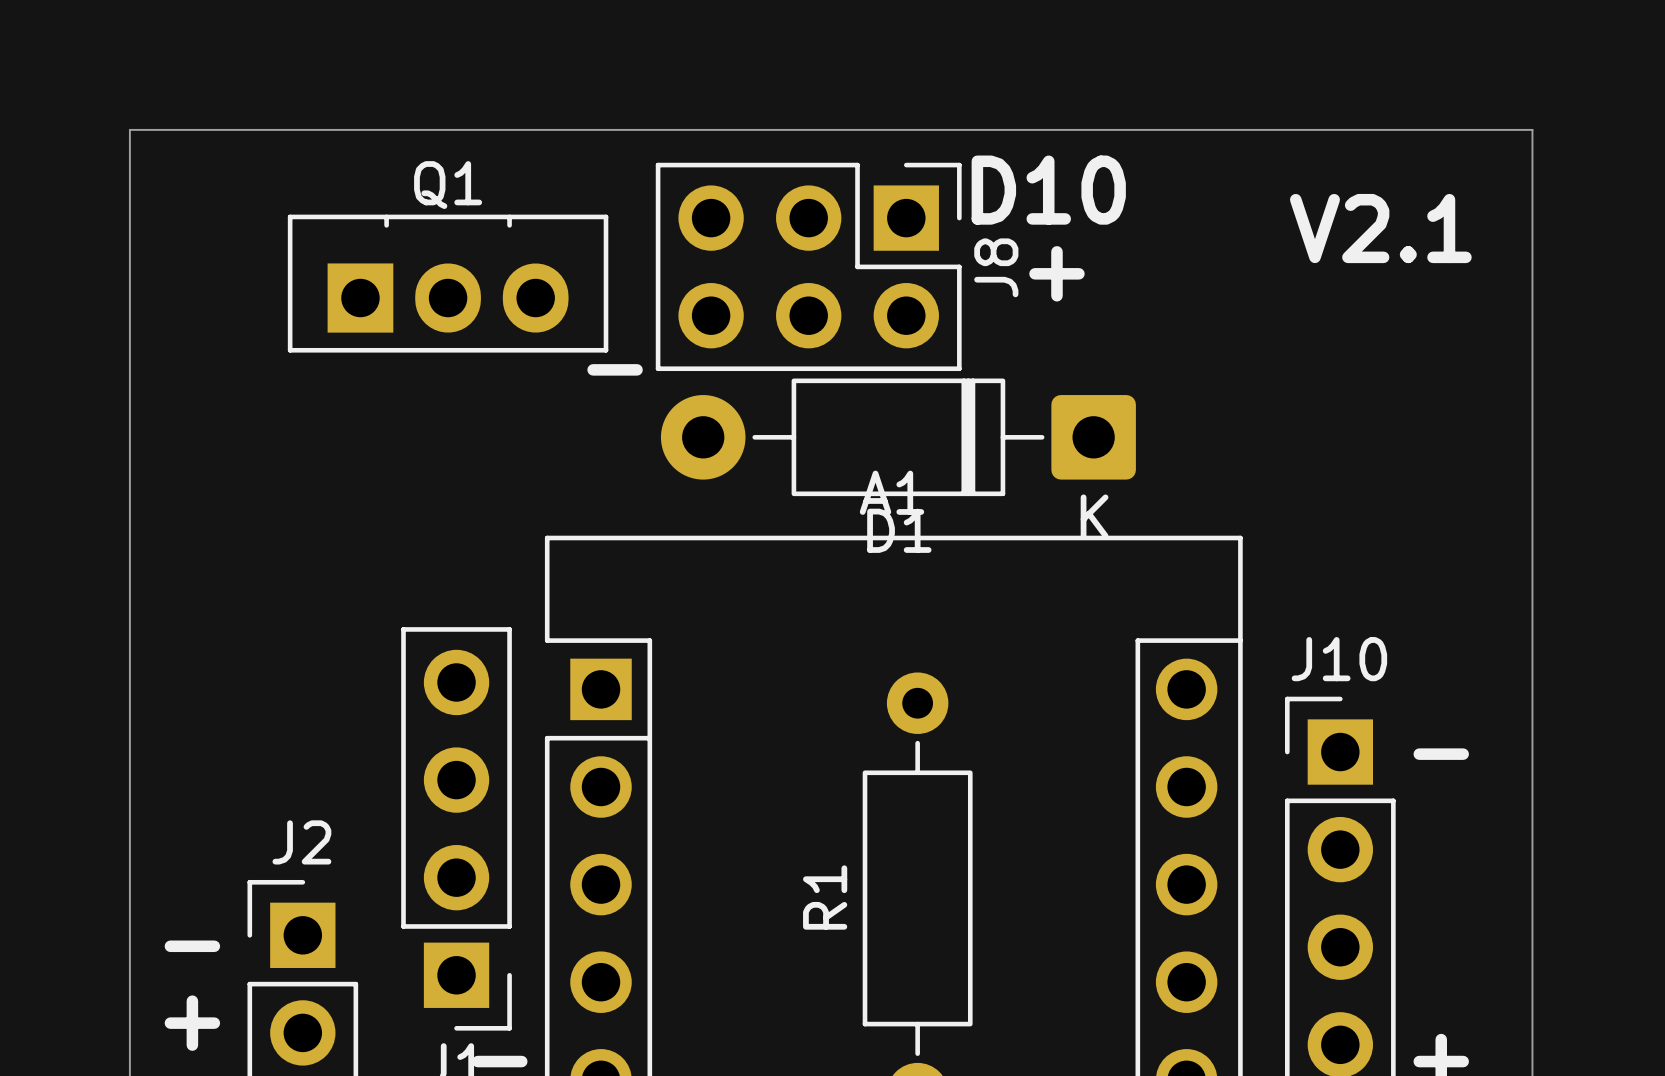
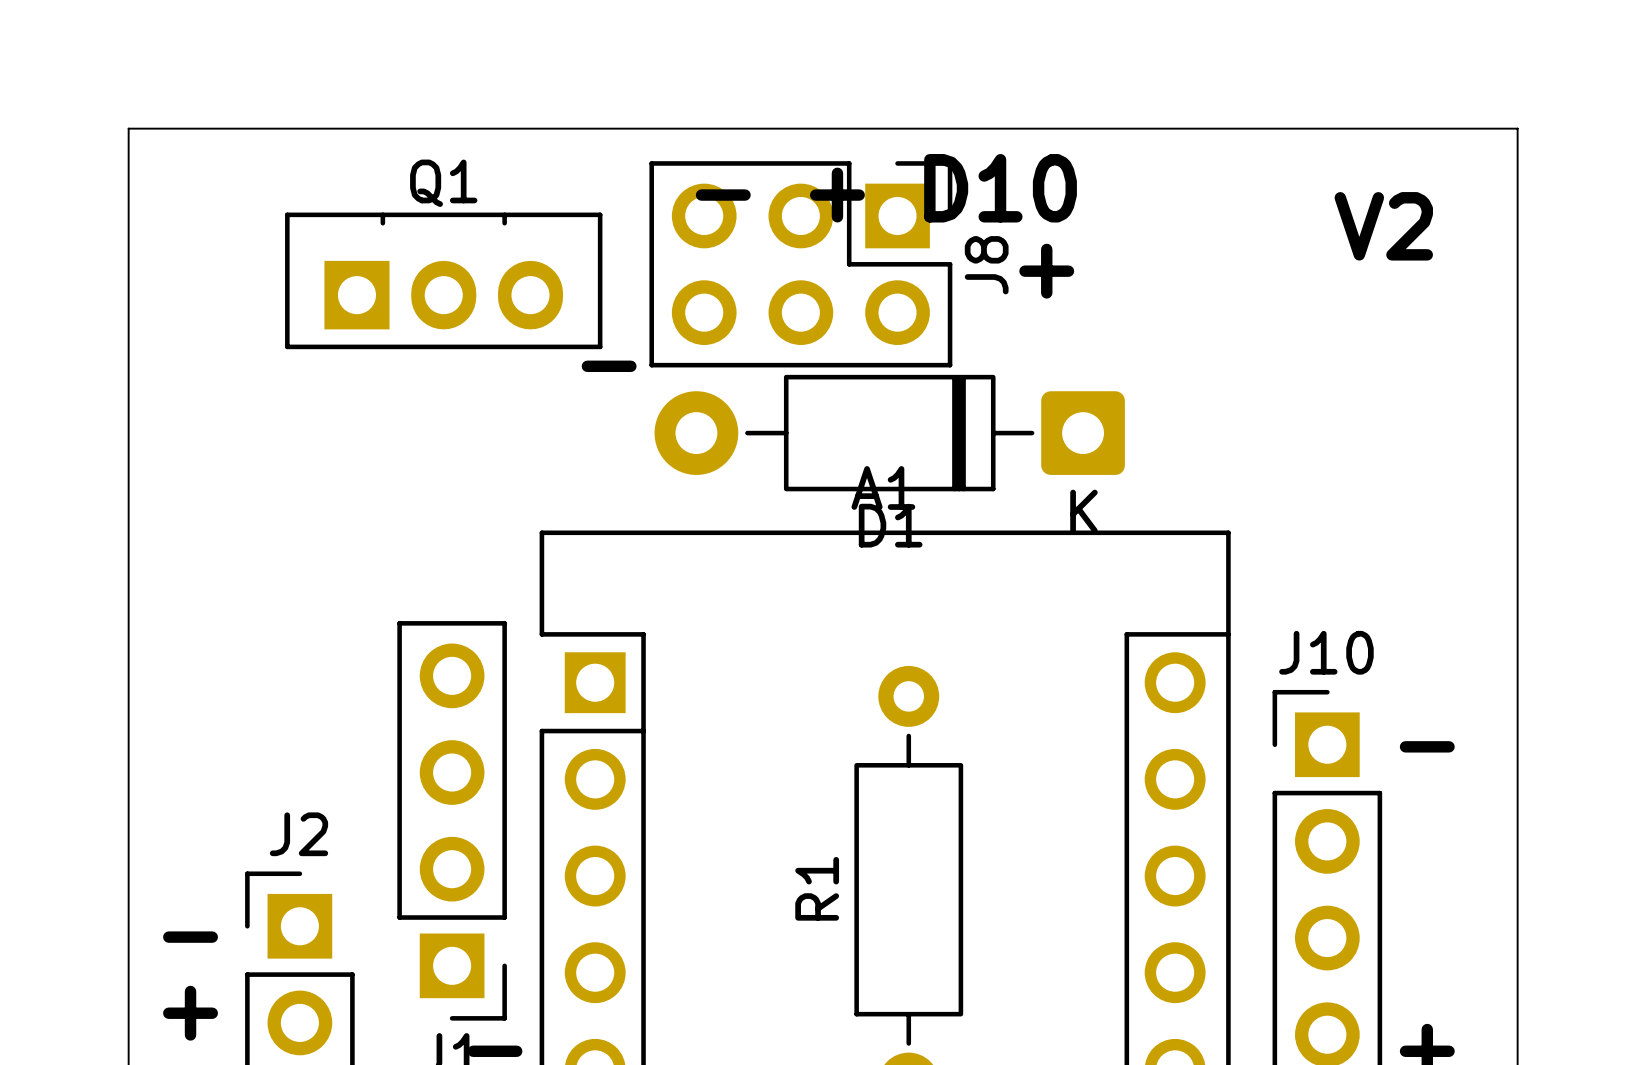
text: none -> - + D10 (886, 188)
text: D10 (1048, 190) -> none
text: V2.1 (1380, 228) -> V2 (1383, 226)

